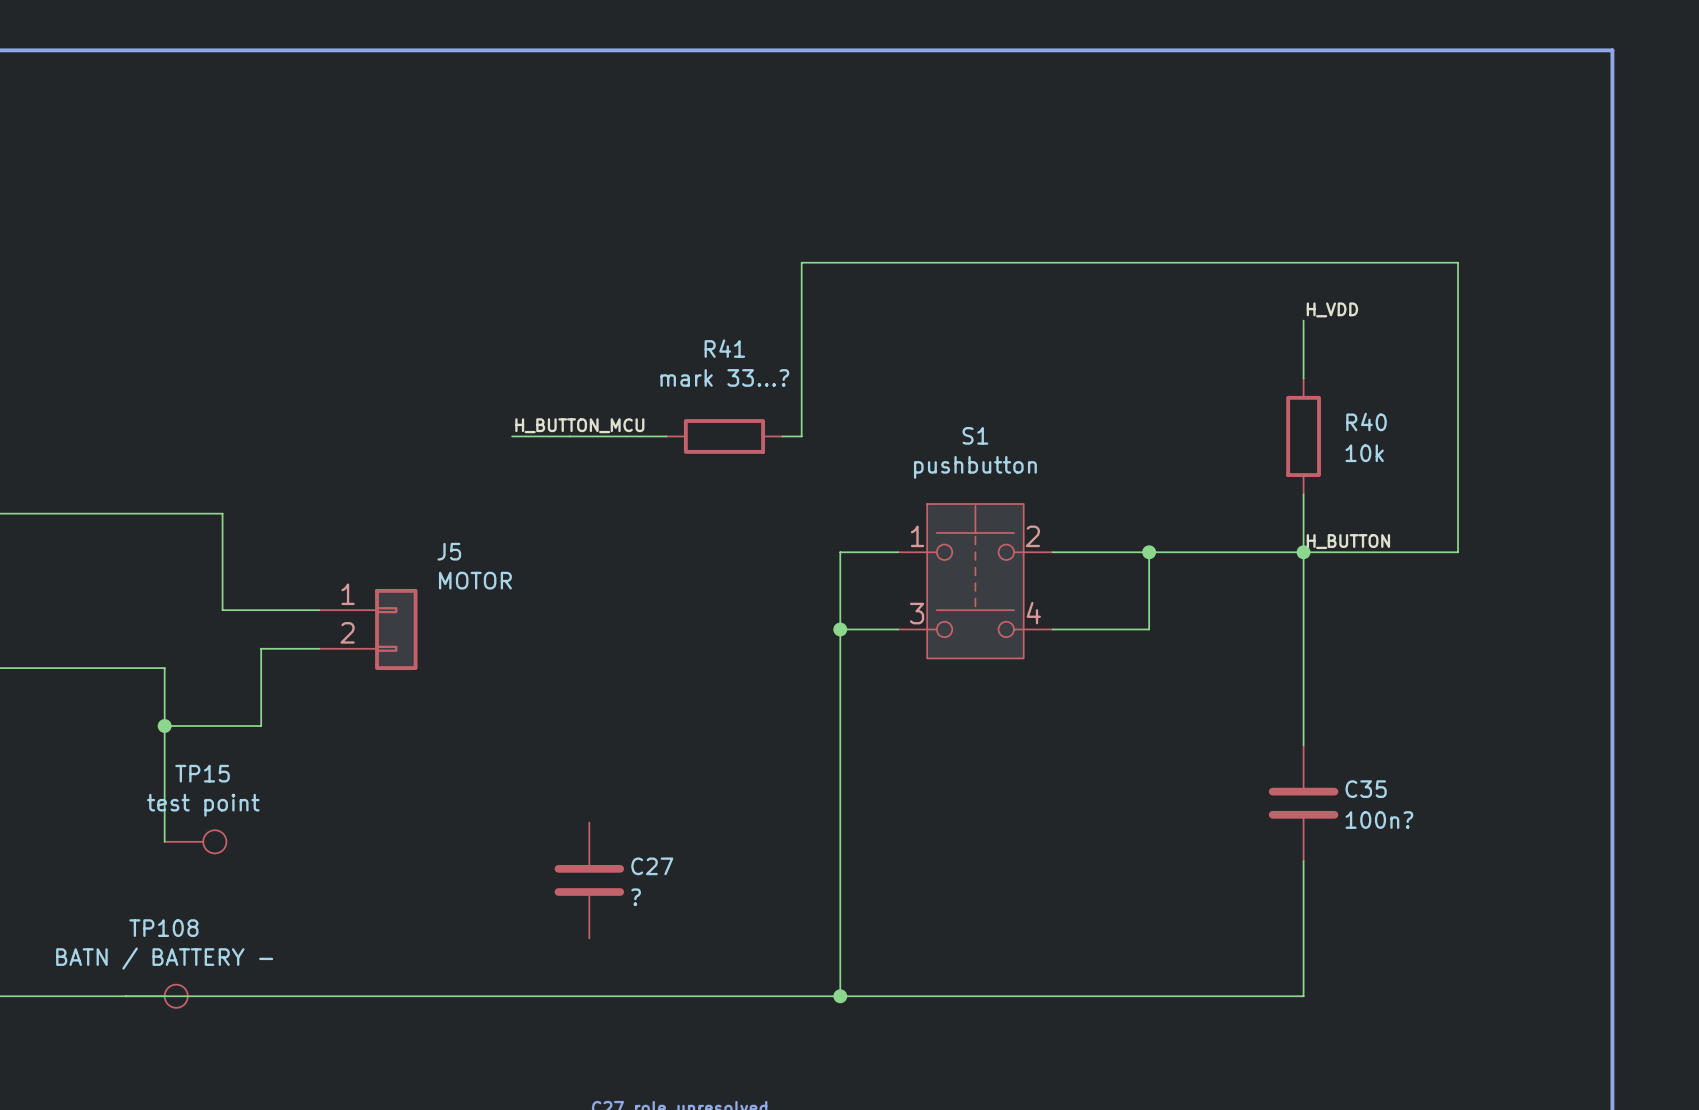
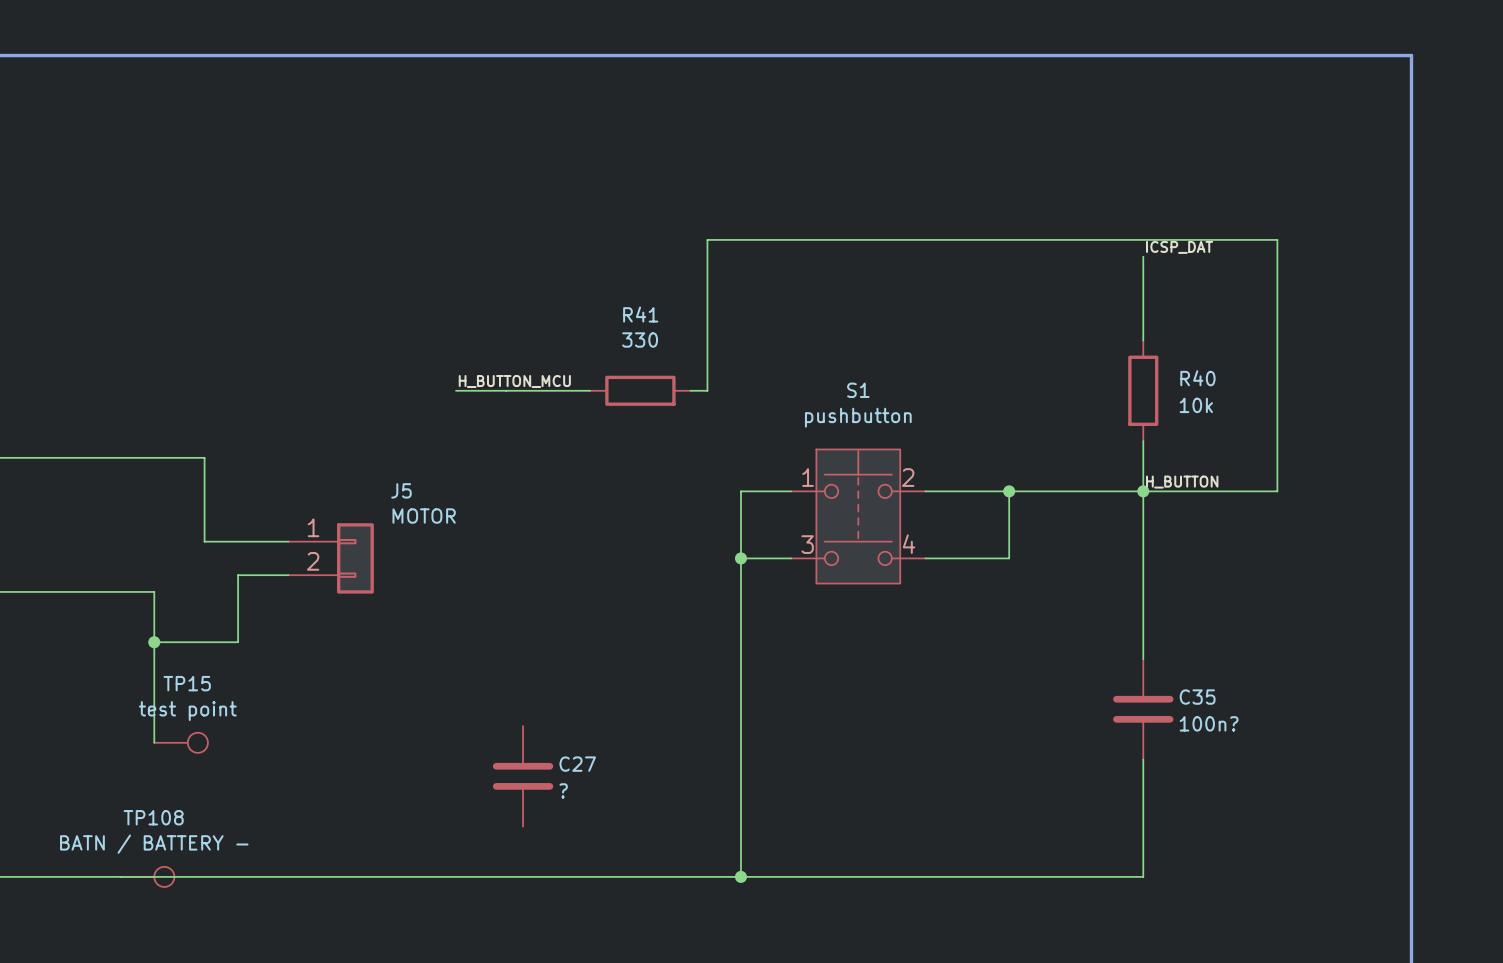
label: none -> ICSP_DAT (1179, 247)
wire: none -> (1143, 256) (1143, 290)
label: H_VDD (1332, 309) -> none
R41 value: mark 33...? (724, 377) -> 330 (640, 340)

